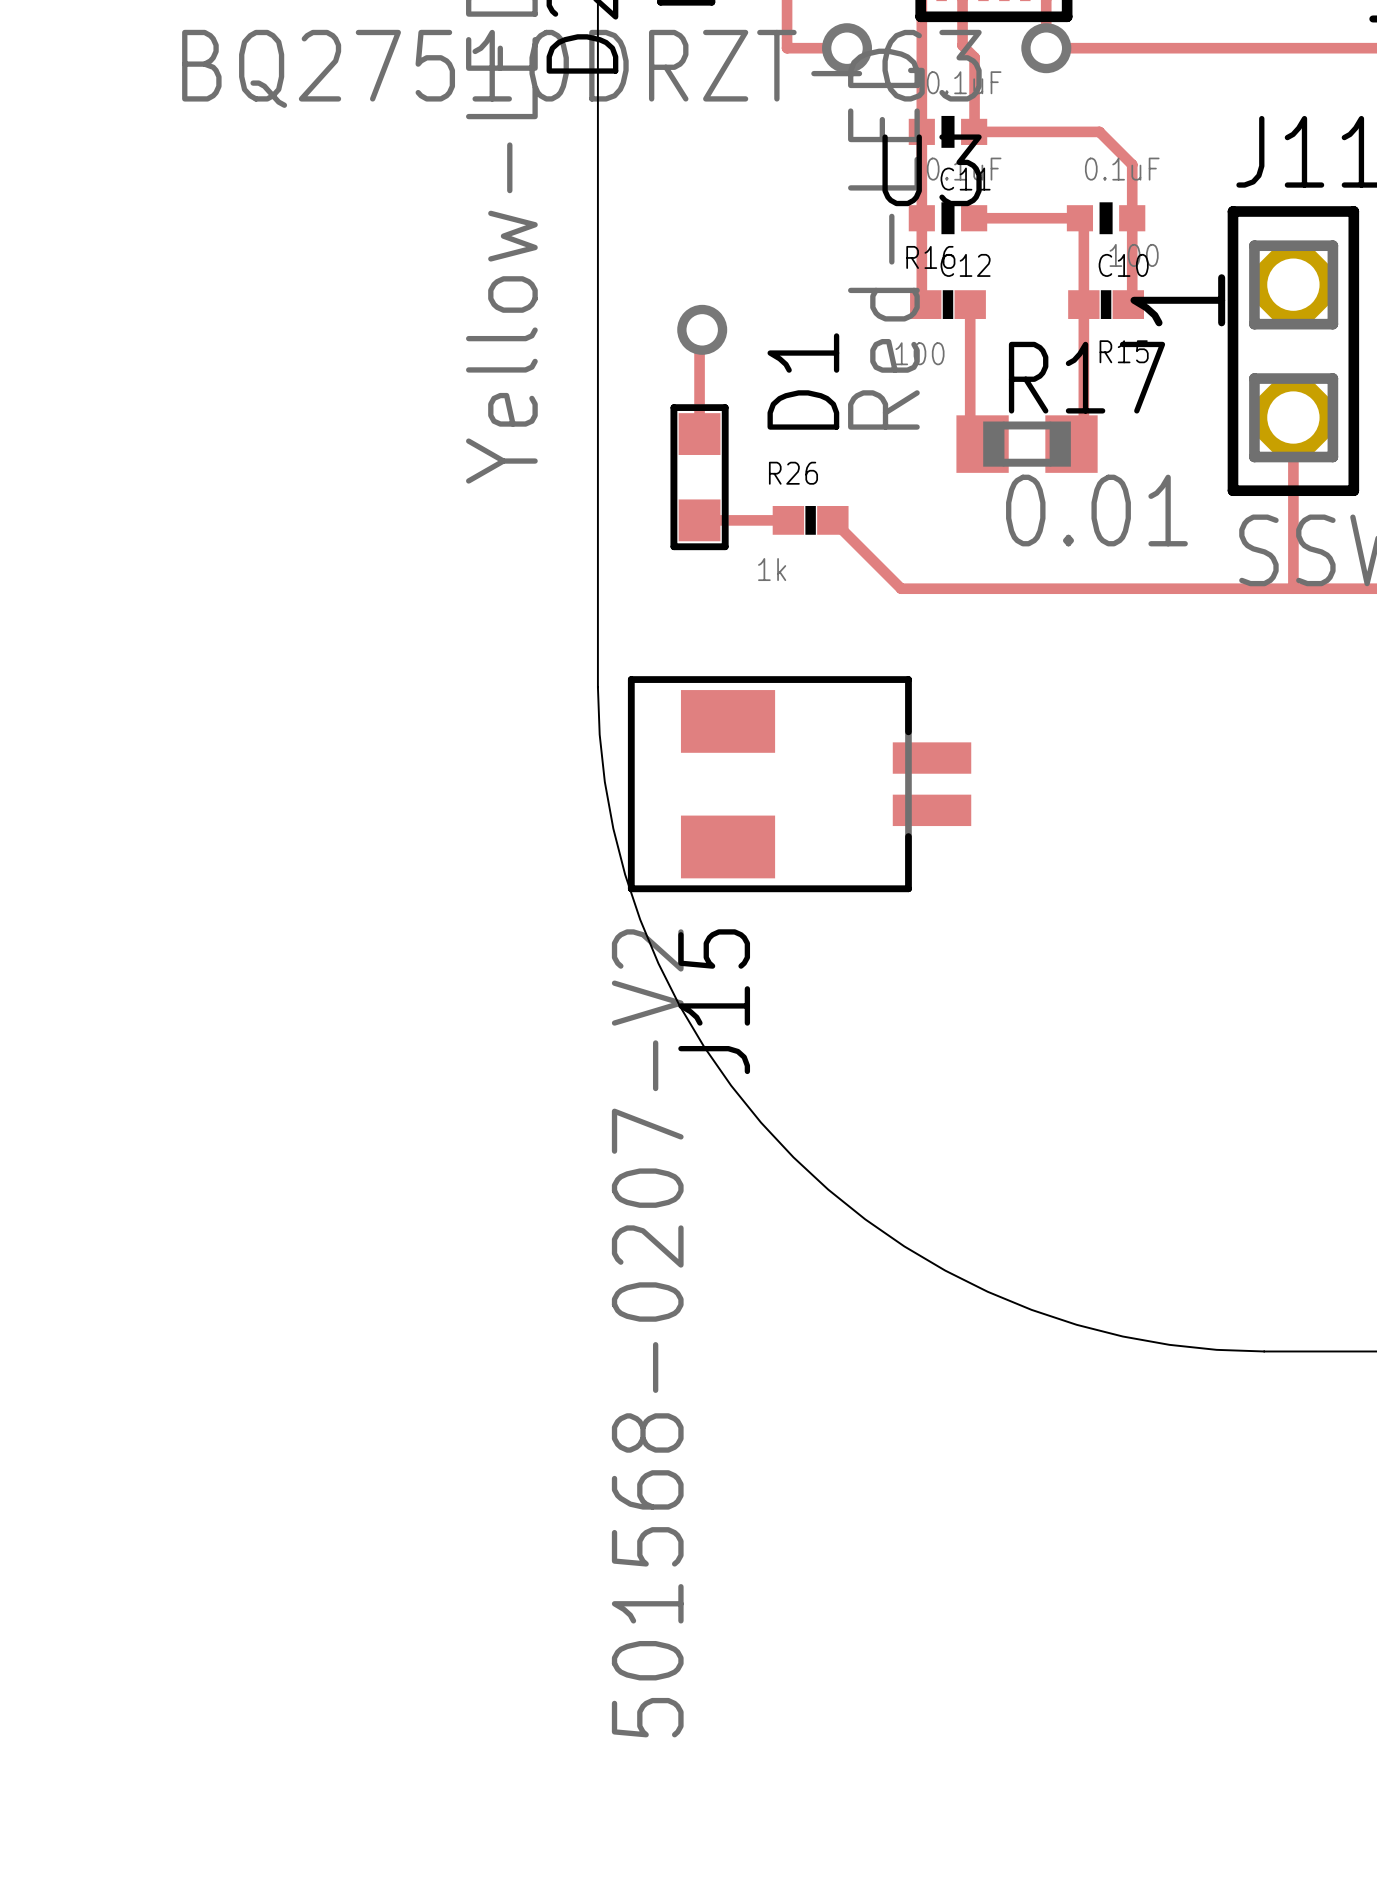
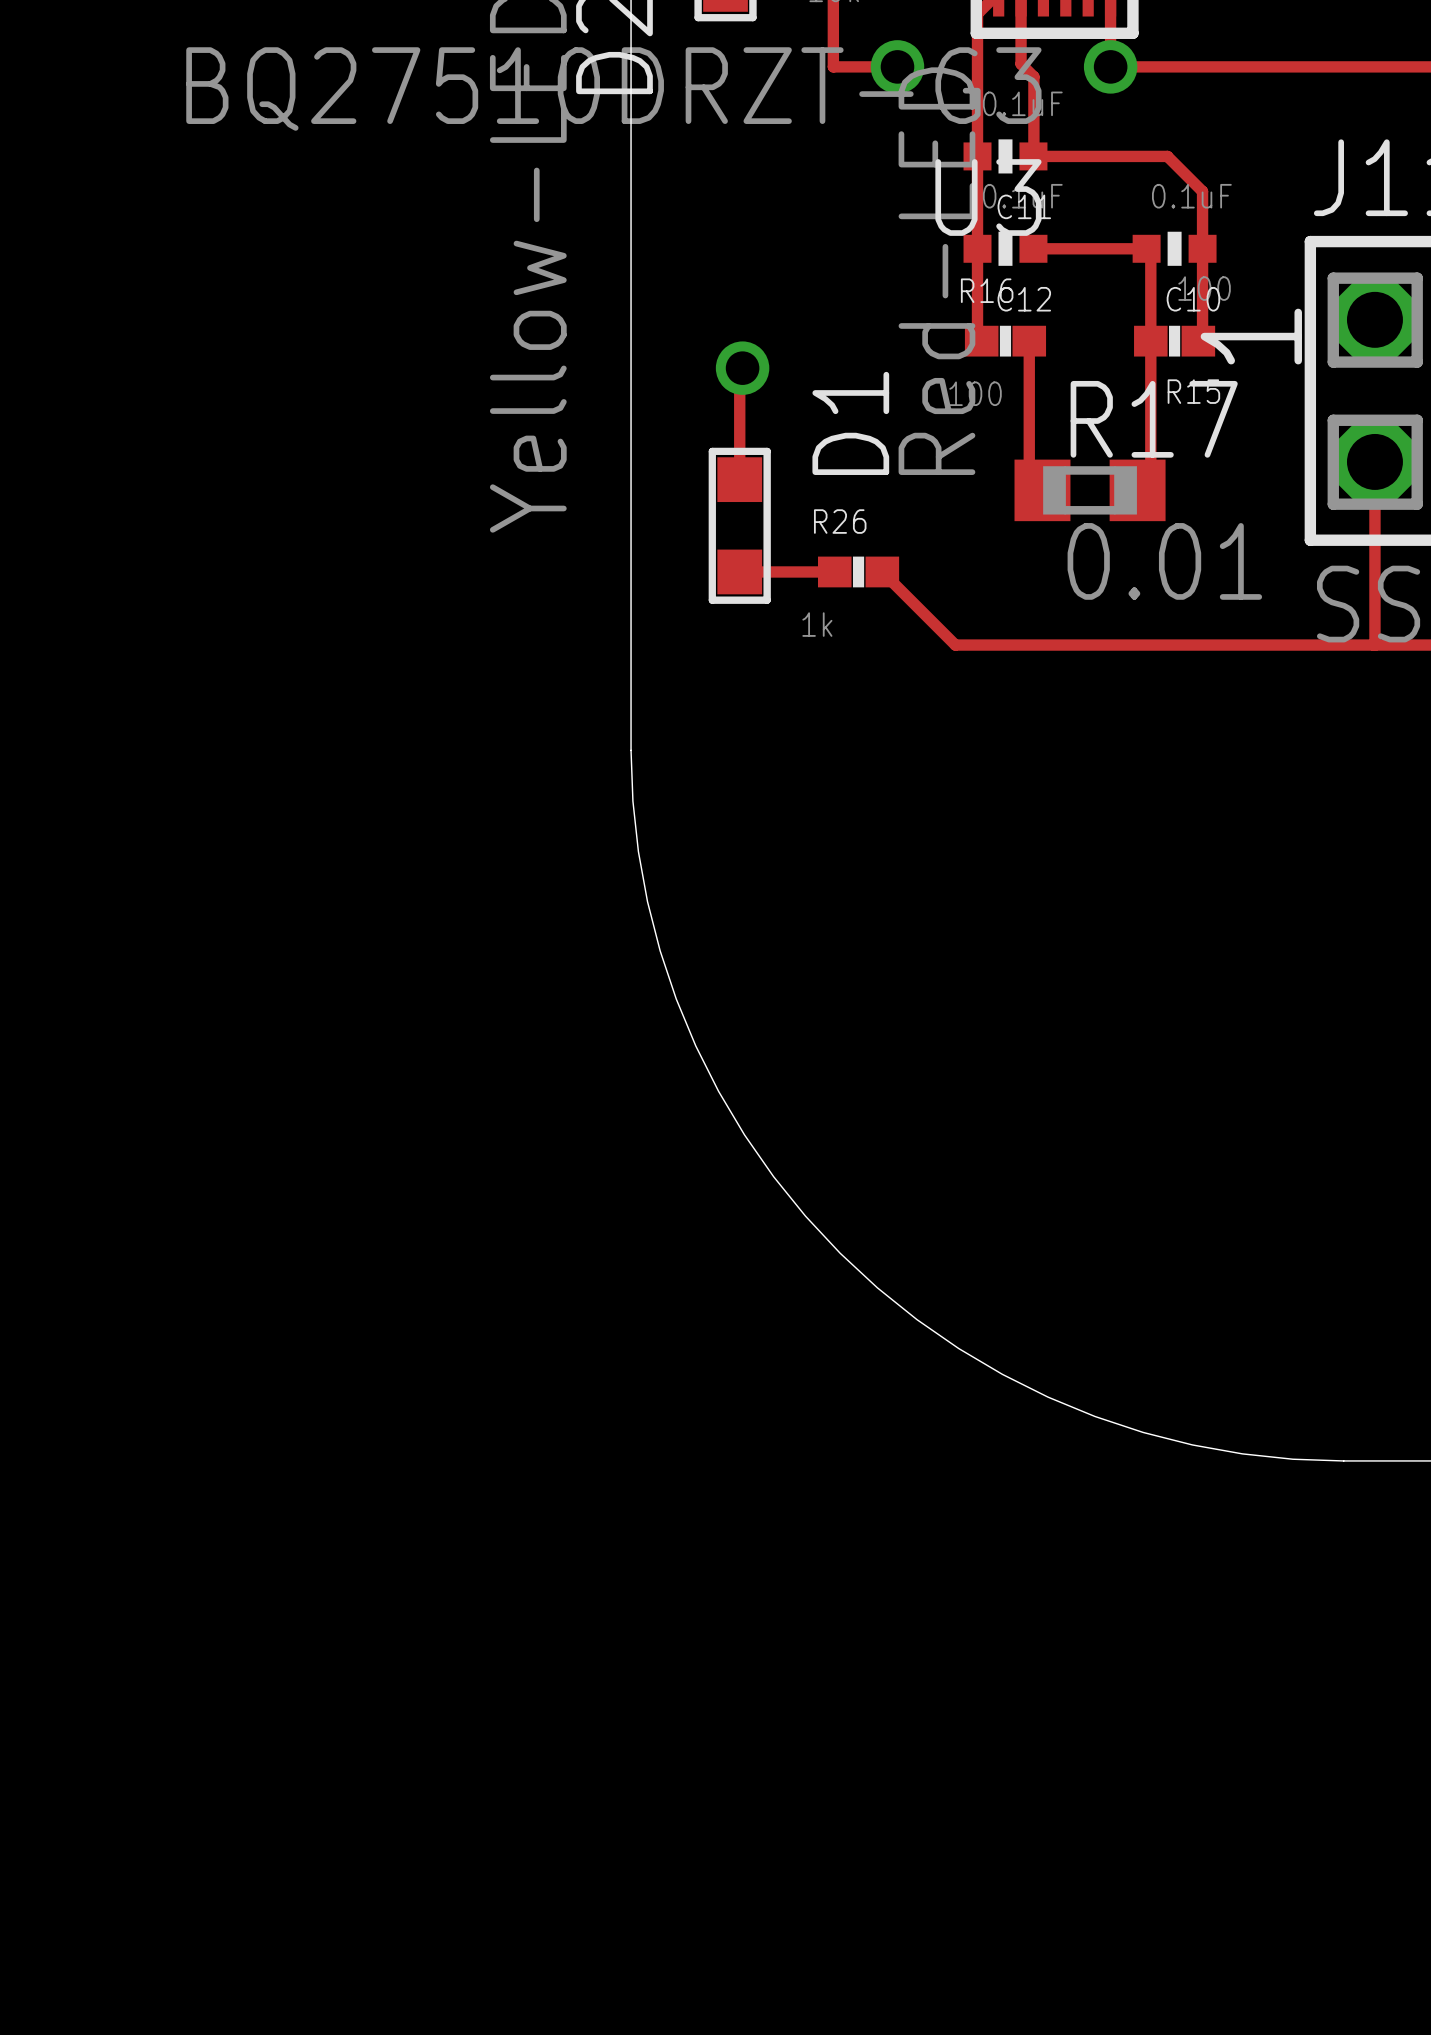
J15: 501568-0207-V2 (799, 784) -> none

